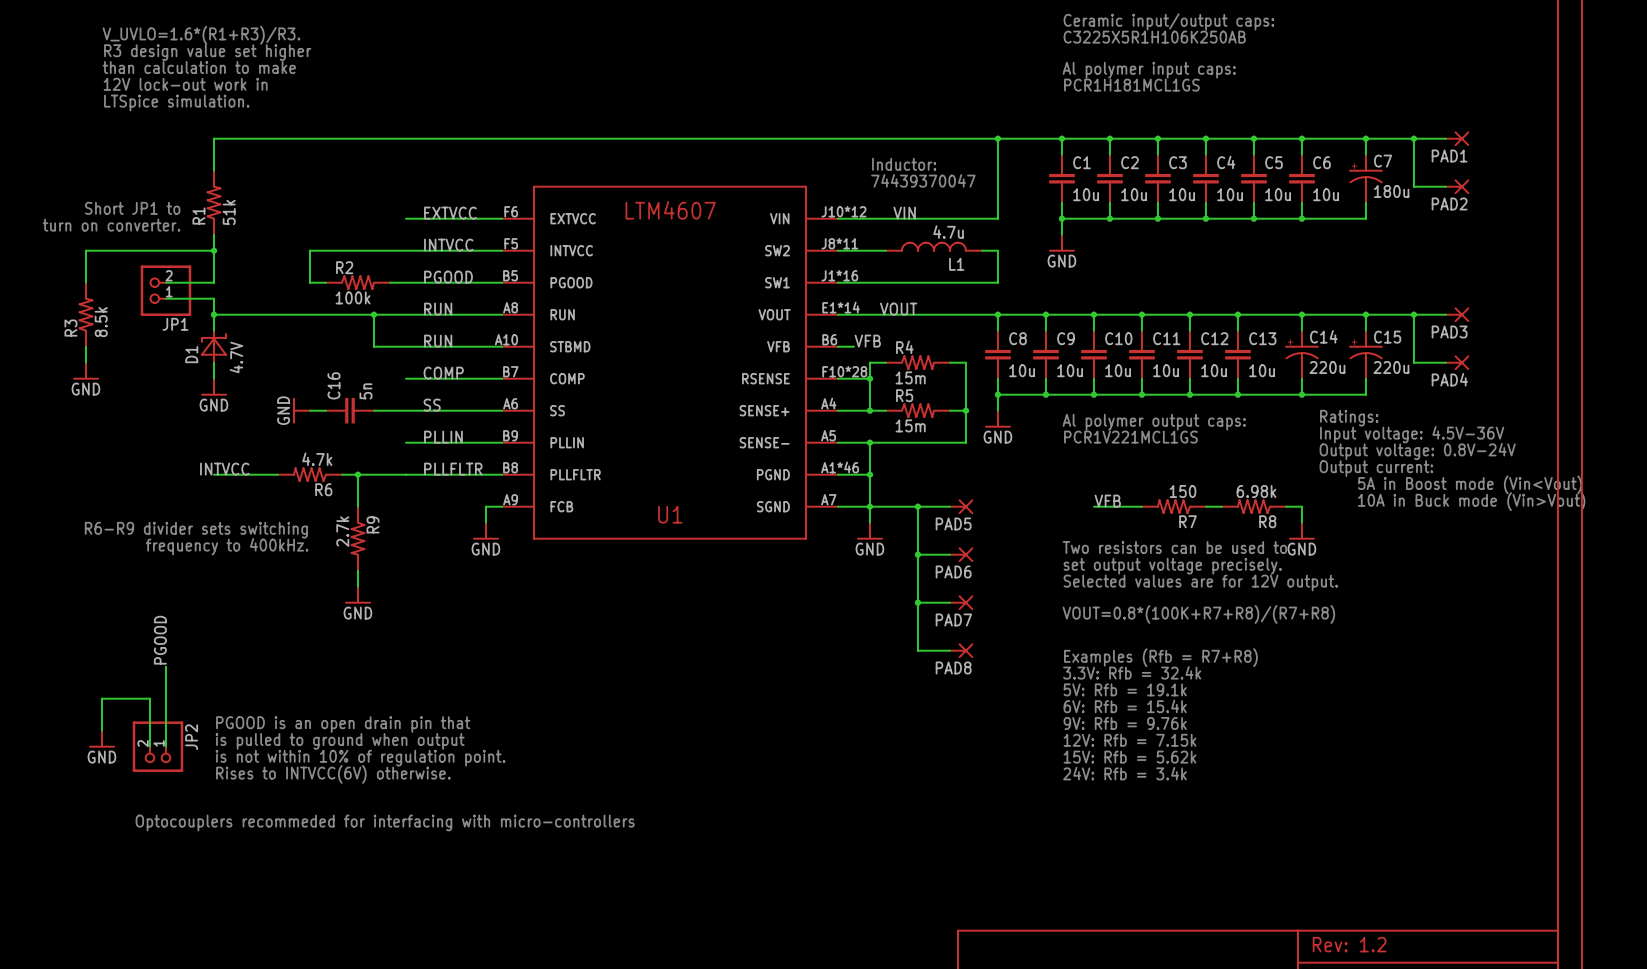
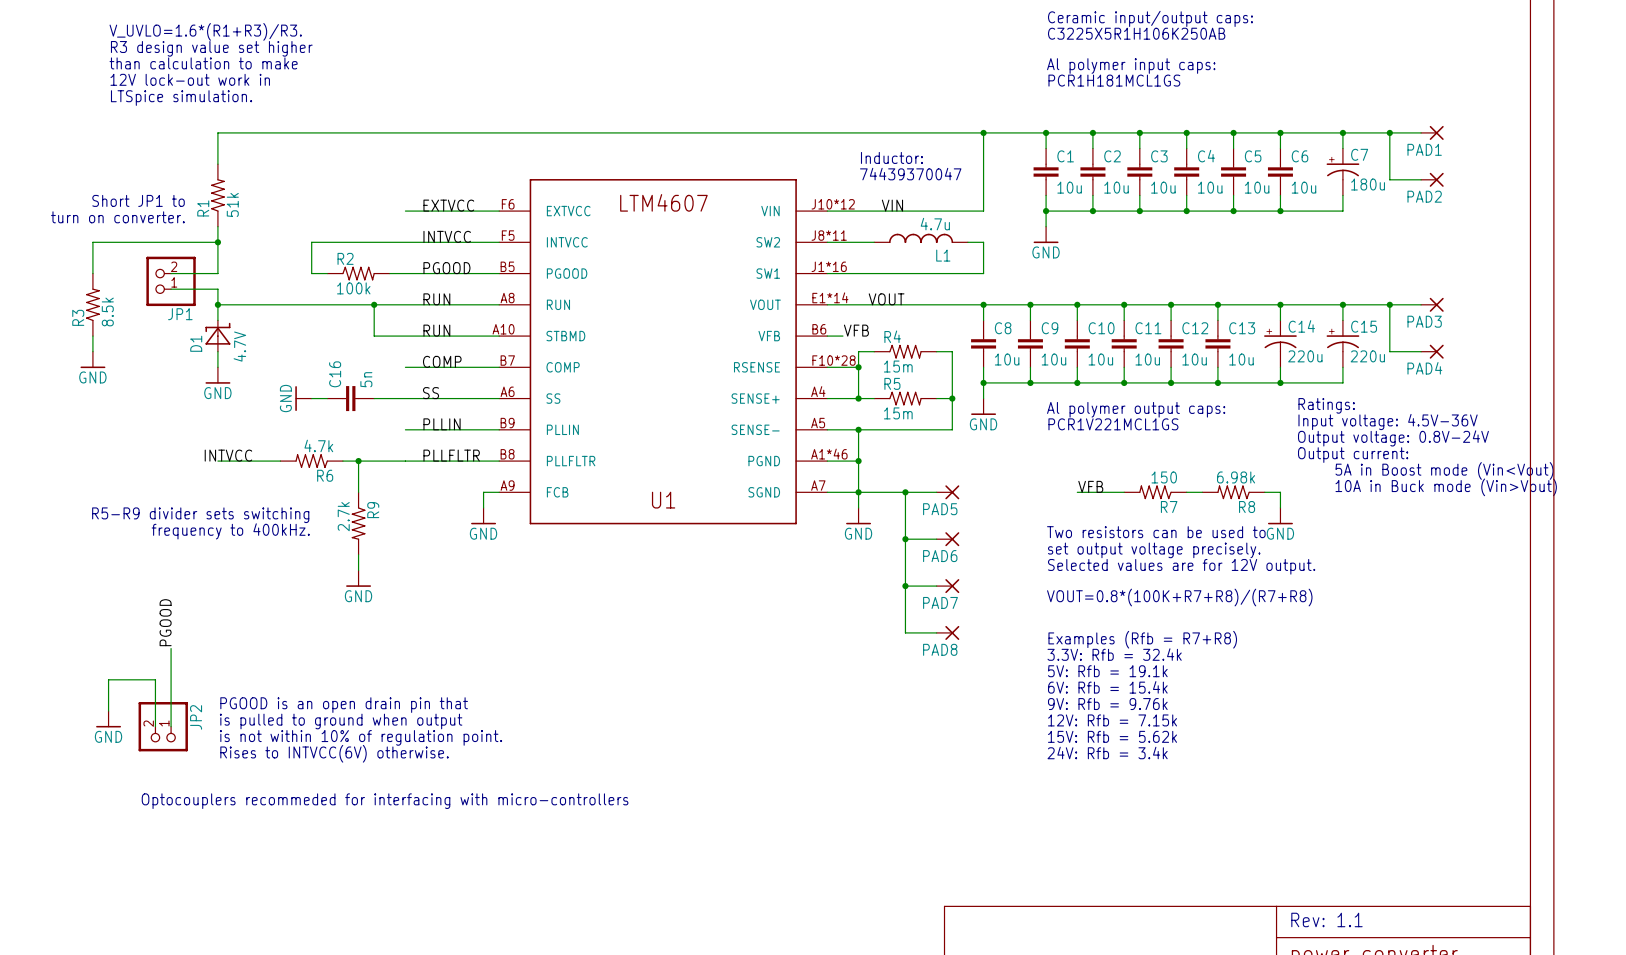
text: R6-R9 divider sets switching (196, 530) -> R5-R9 divider sets switching (200, 515)
text: Rev: 1.2 (1349, 944) -> Rev: 1.1 (1326, 919)

